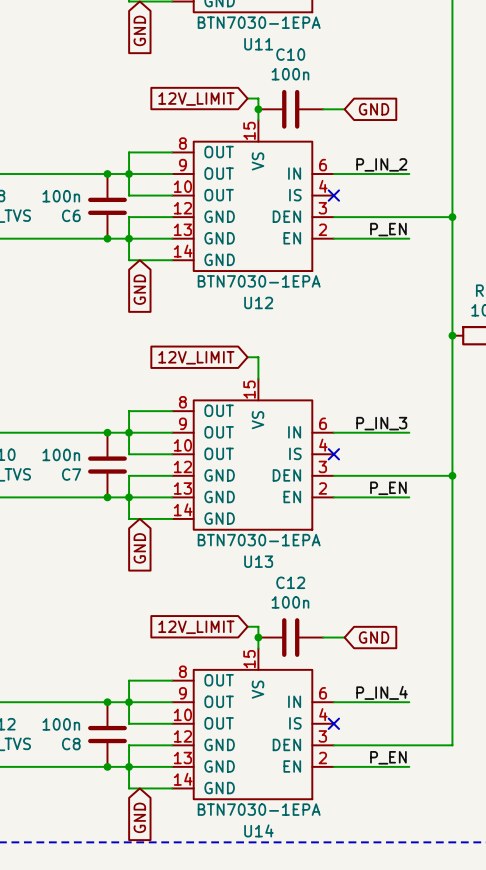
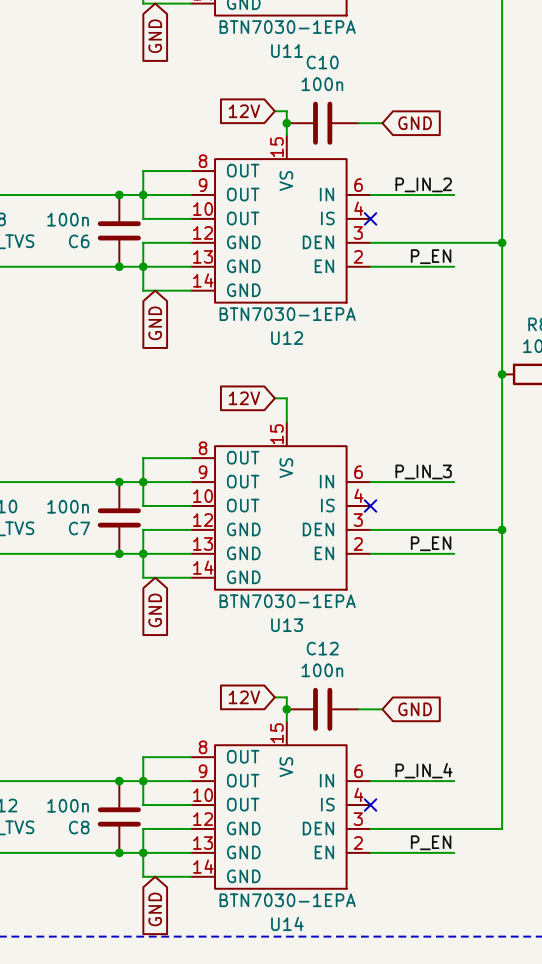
global label: 12V_LIMIT (196, 99) -> 12V (244, 111)
global label: 12V_LIMIT (196, 357) -> 12V (244, 398)
global label: 12V_LIMIT (196, 627) -> 12V (244, 697)

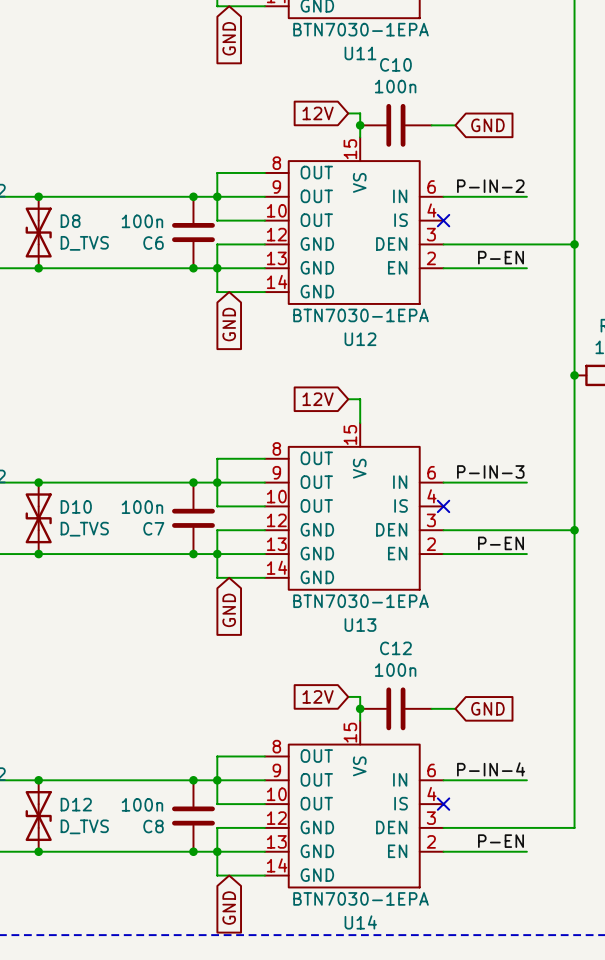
label: P_IN_2 (423, 184) -> P-IN-2 (490, 186)
label: P_EN (431, 256) -> P-EN (501, 257)
label: P_IN_3 (423, 471) -> P-IN-3 (490, 471)
label: P_EN (431, 543) -> P-EN (501, 543)
label: P_IN_4 (423, 770) -> P-IN-4 (491, 769)
label: P_EN (431, 842) -> P-EN (501, 841)

